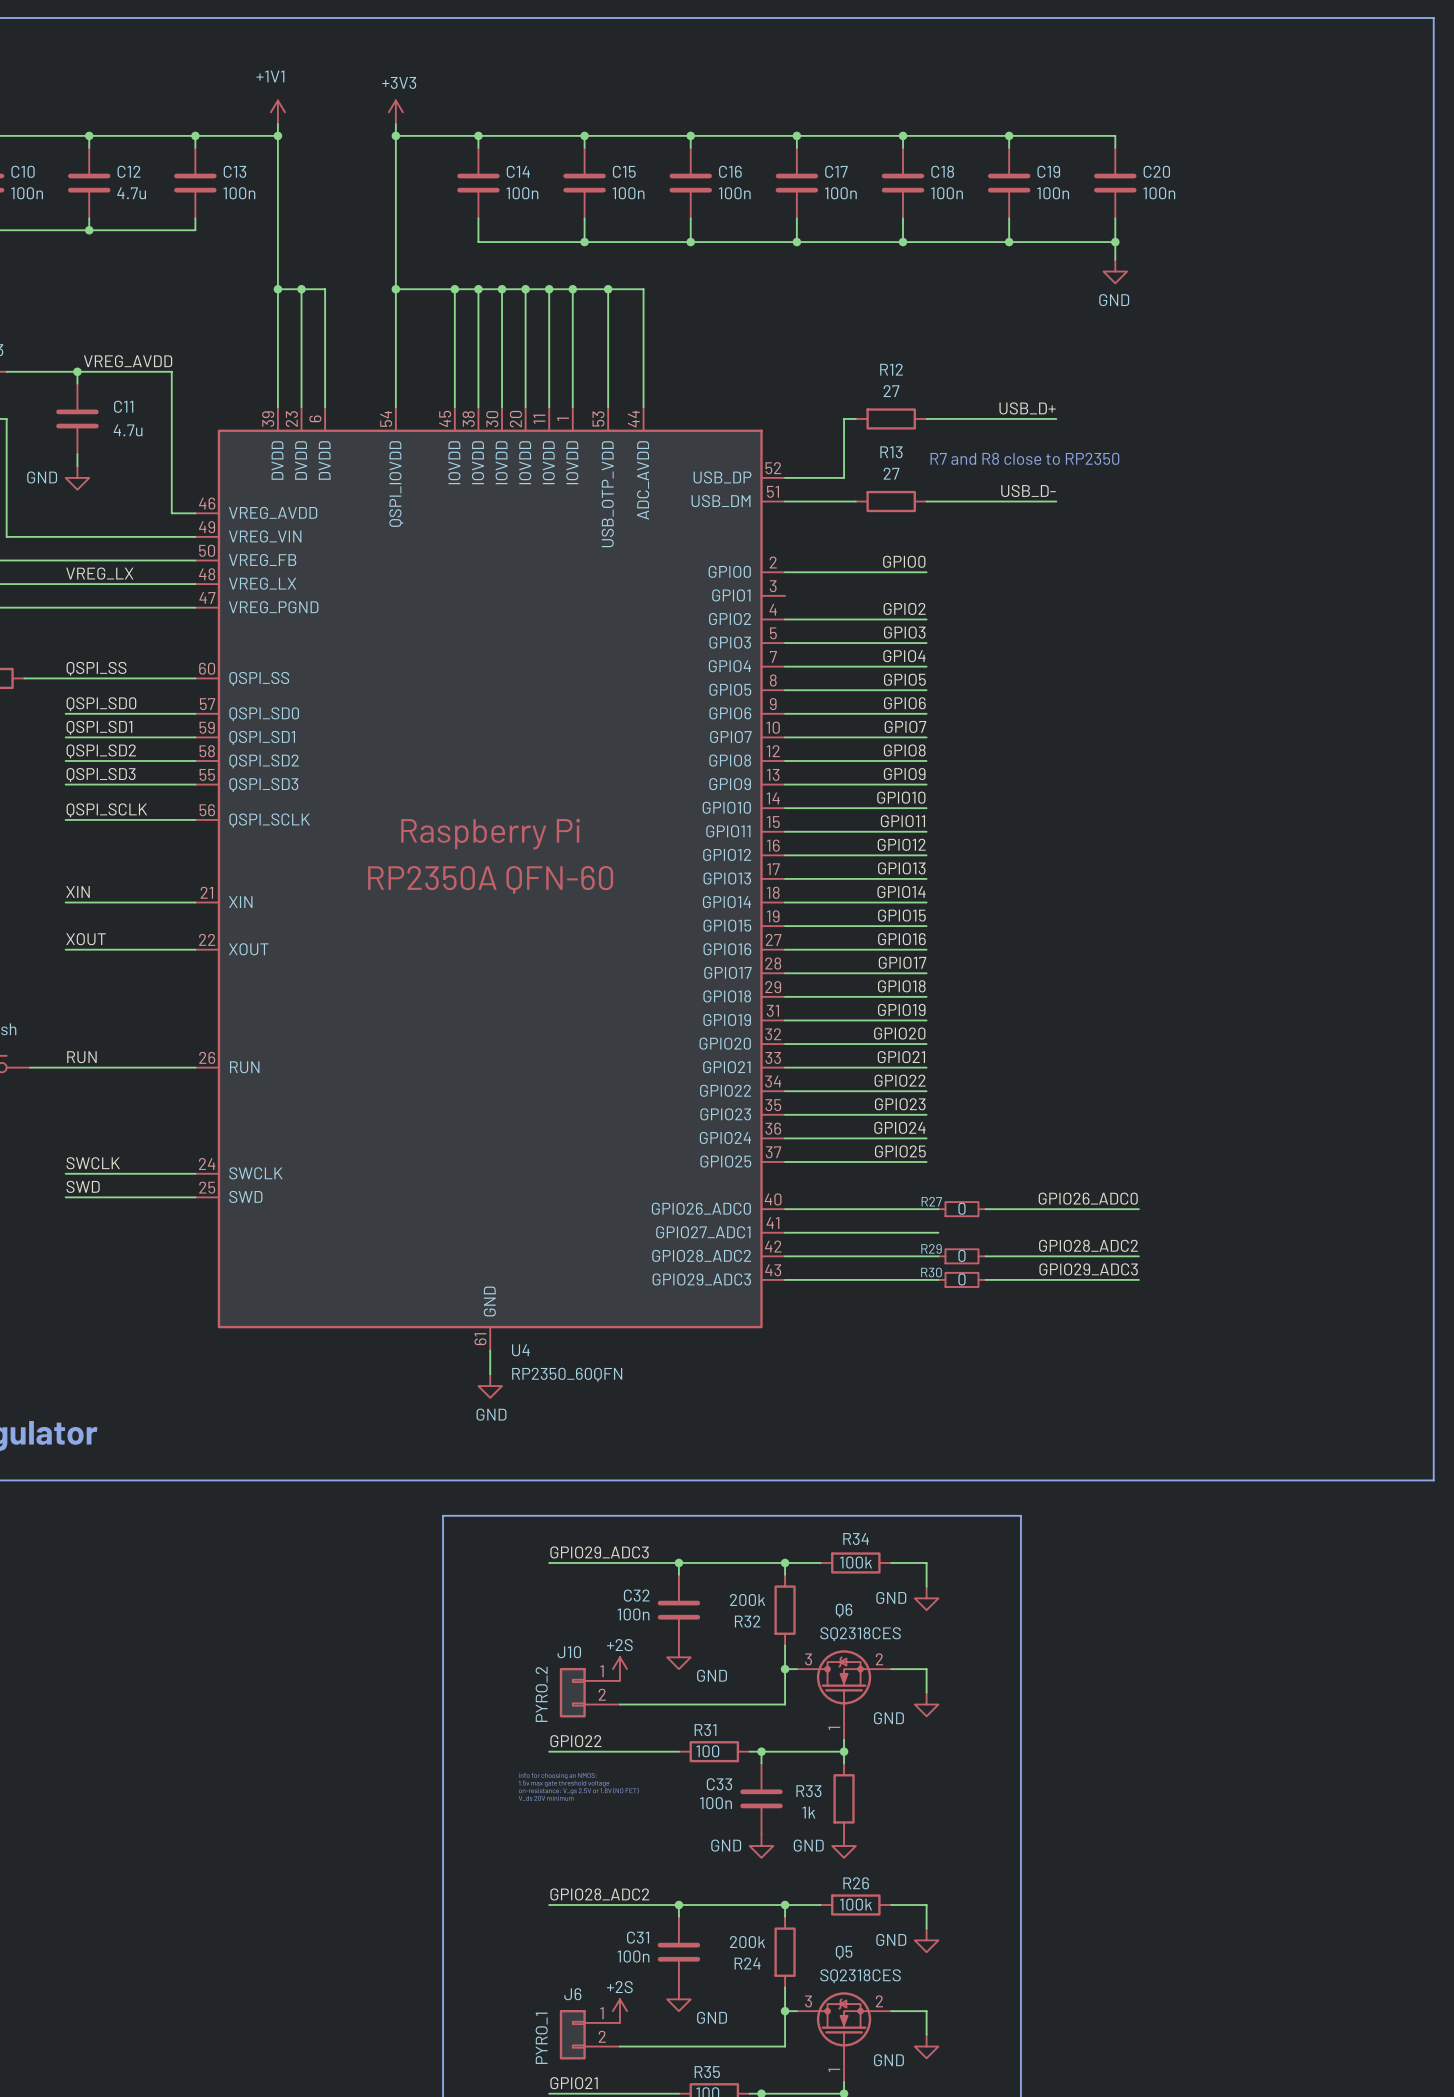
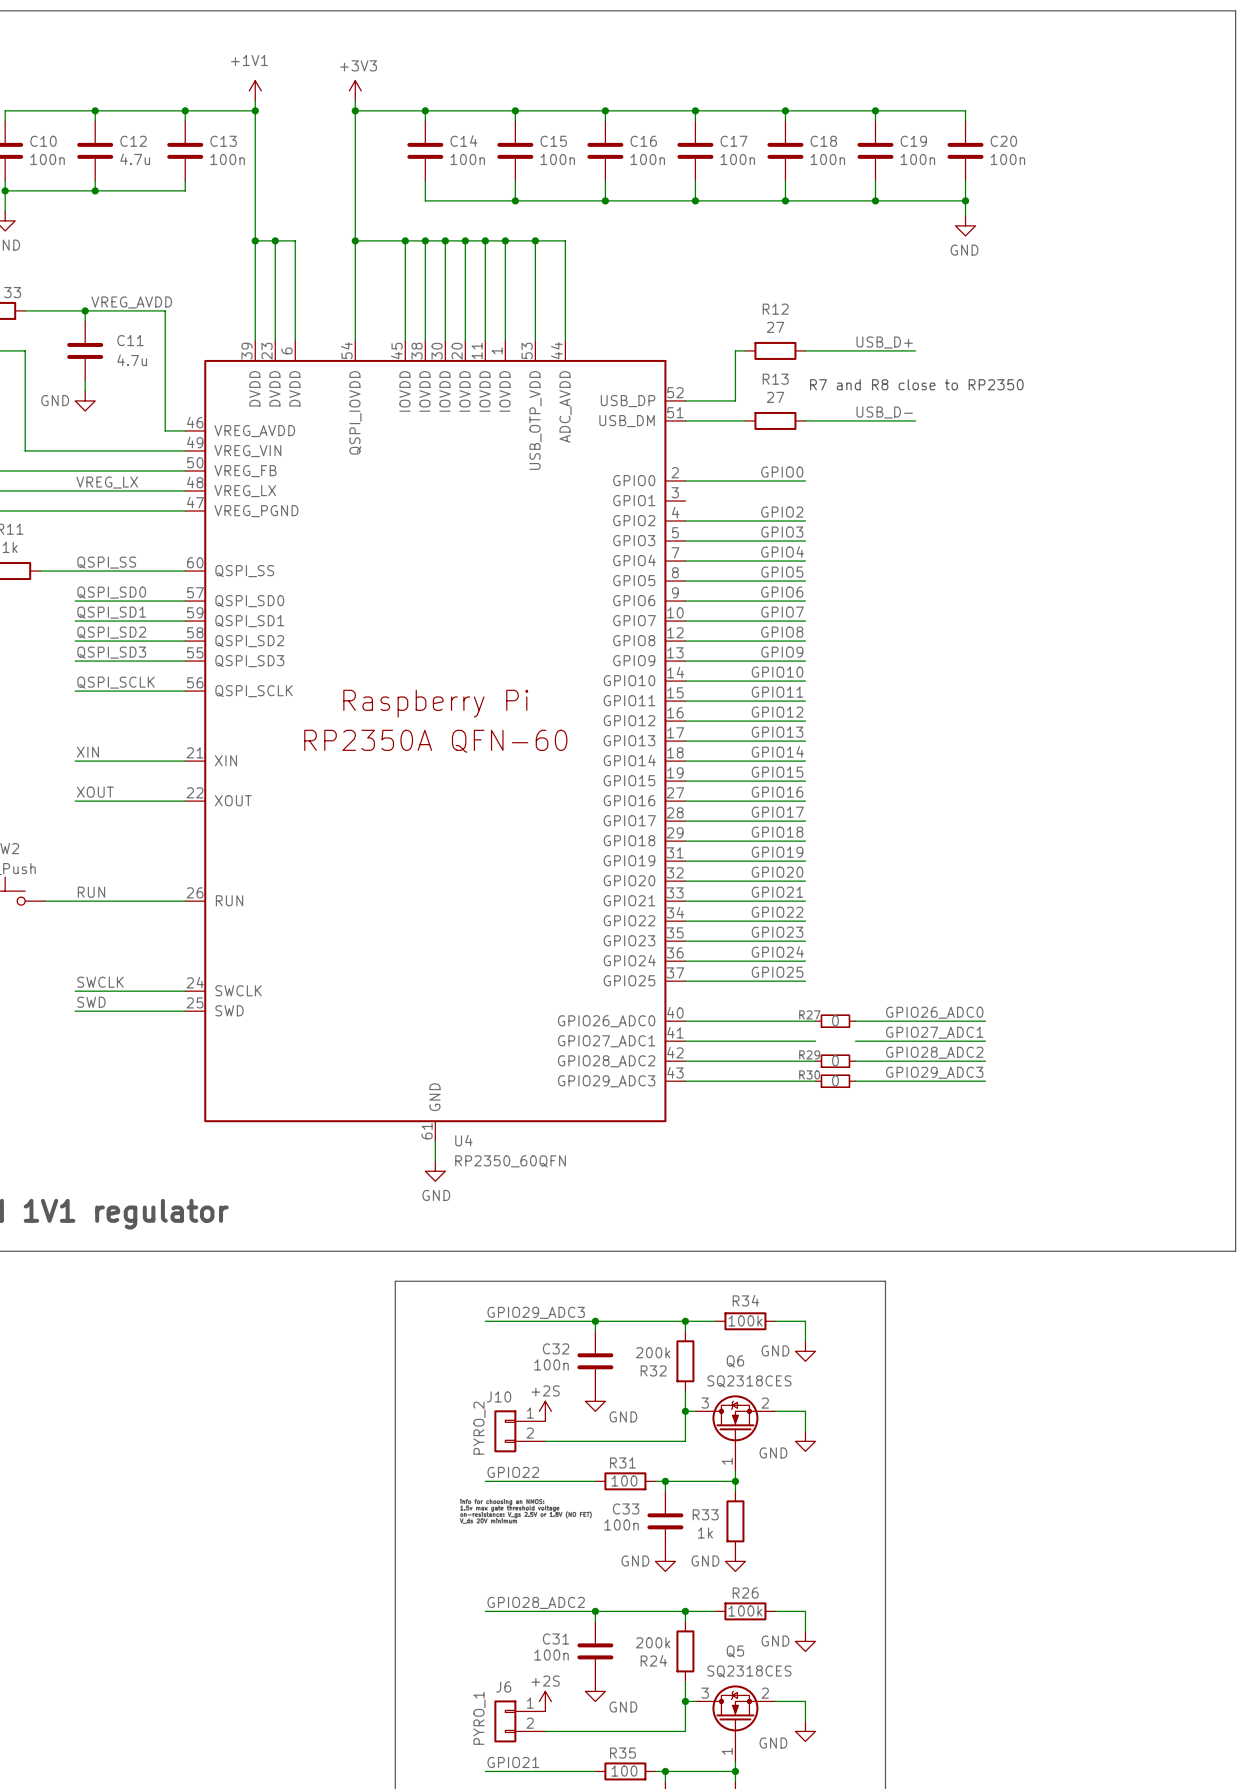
label: none -> GPIO27_ADC1 (934, 1032)
wire: none -> (855, 1041) (985, 1041)

